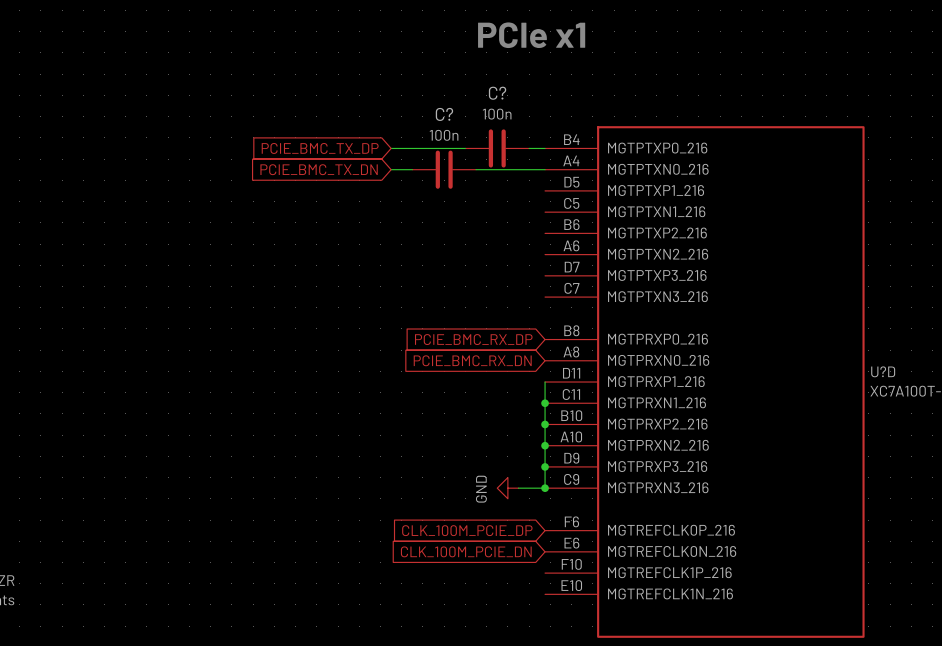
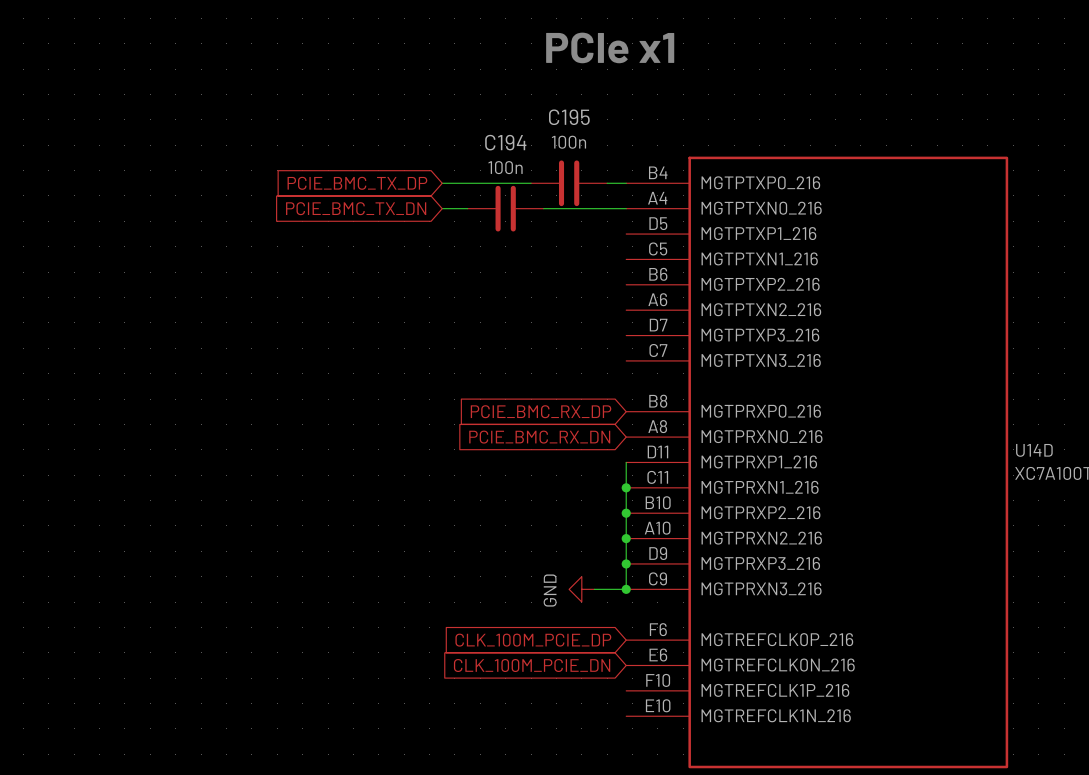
C? name: C? (497, 93) -> C195 (569, 117)
C? name: C? (444, 114) -> C194 (505, 142)
U?D name: U?D (883, 371) -> U14D (1034, 450)

